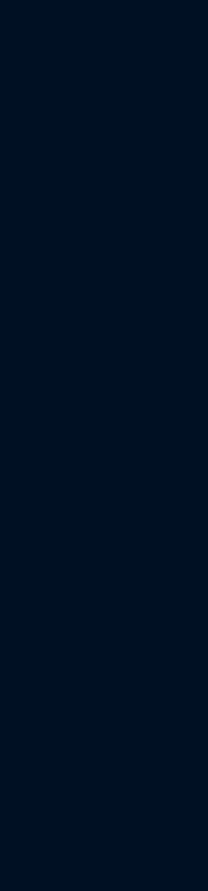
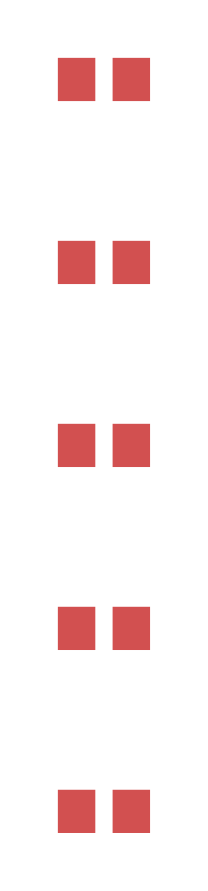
part: none -> (103, 79)
part: none -> (103, 262)
part: none -> (103, 445)
part: none -> (103, 628)
part: none -> (103, 811)

